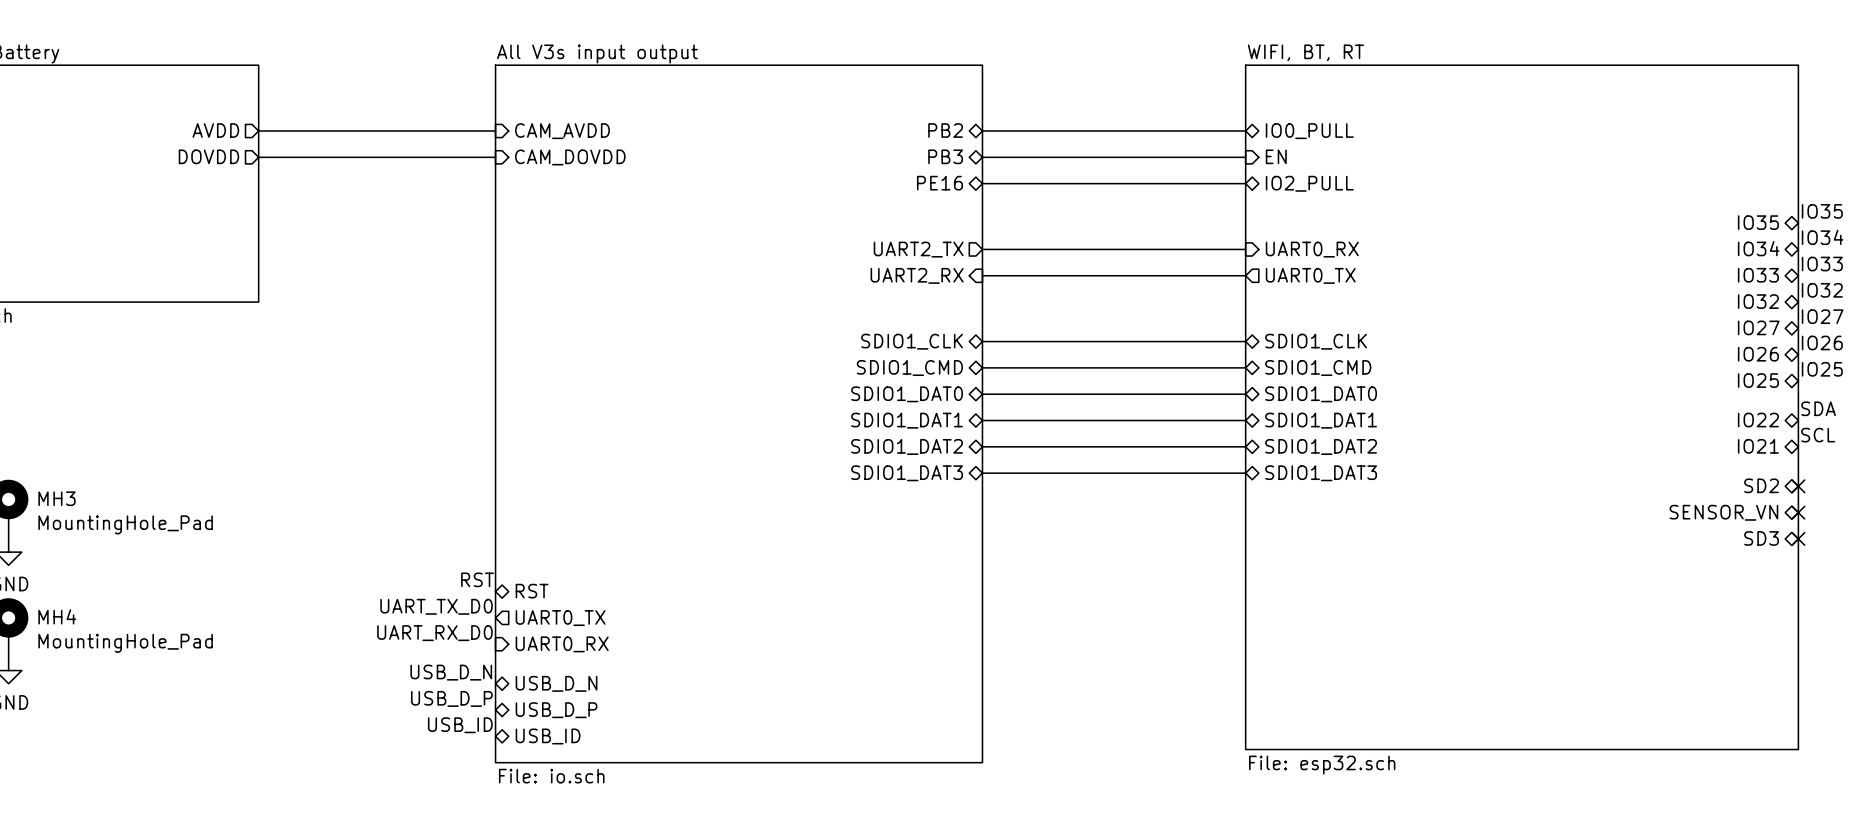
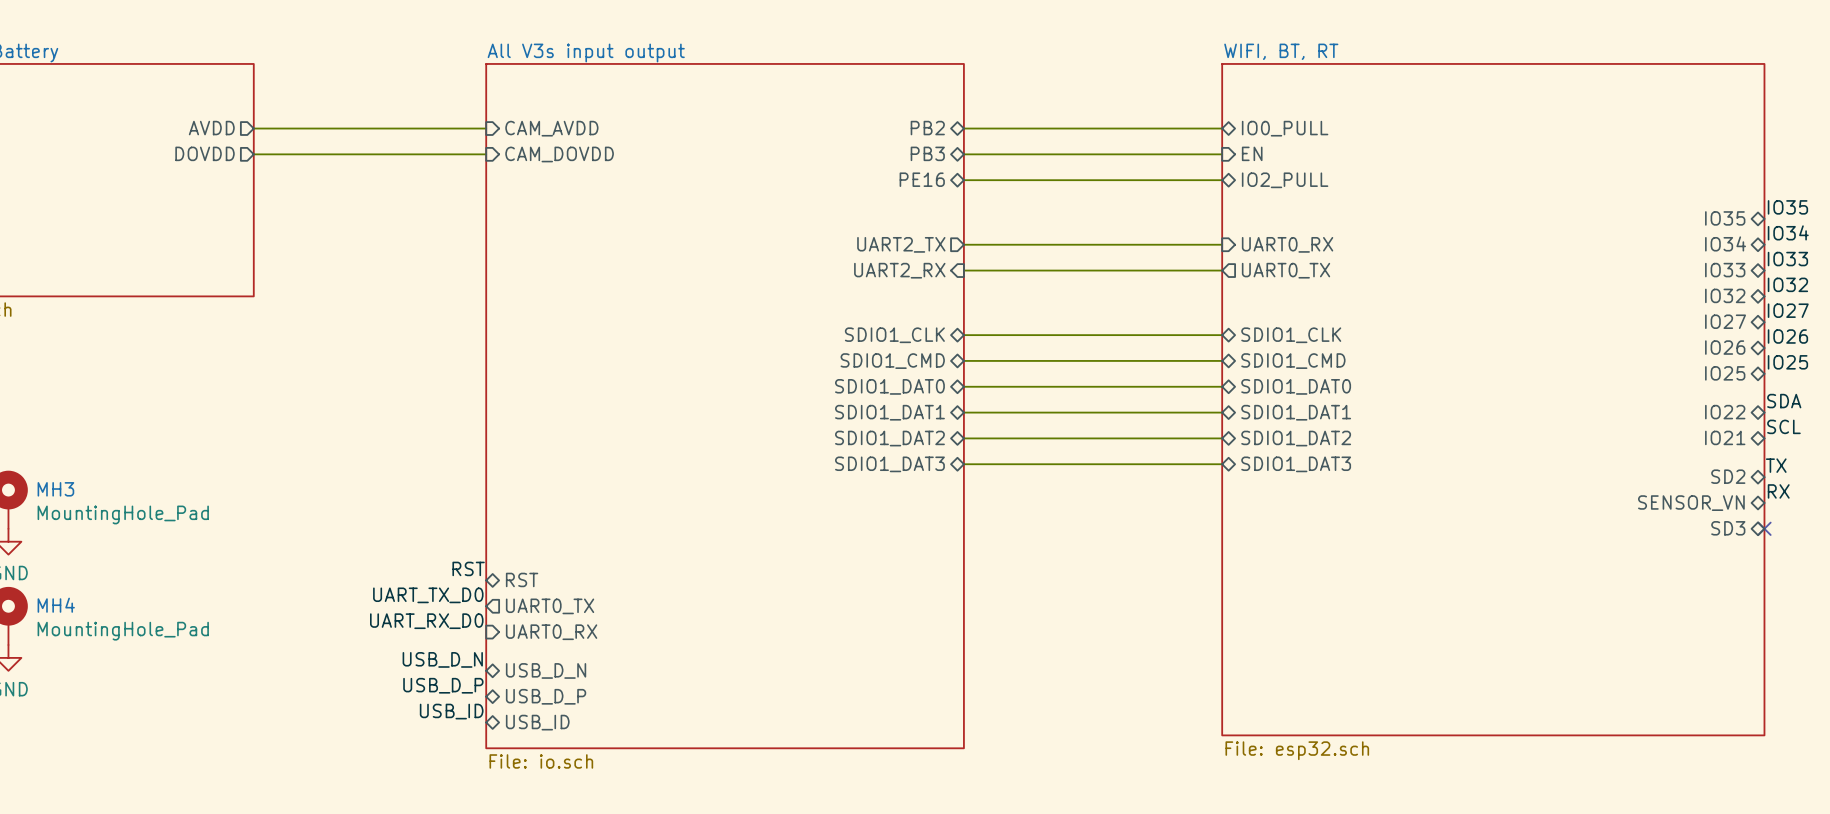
label: none -> TX (1776, 465)
no-connect mark: (1798, 486) -> none
label: none -> RX (1778, 491)
no-connect mark: (1798, 512) -> none

